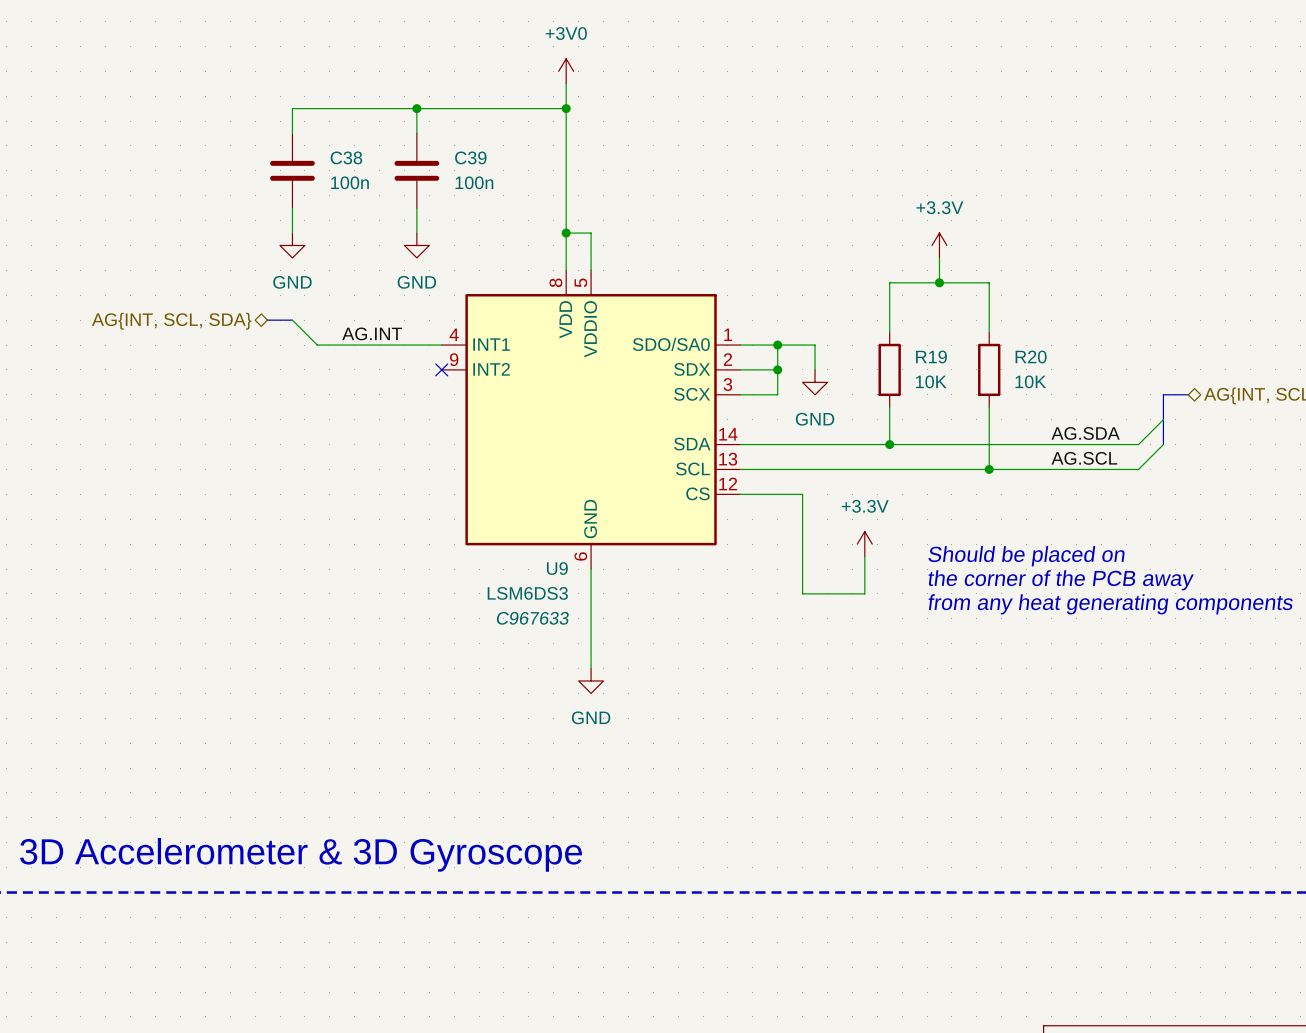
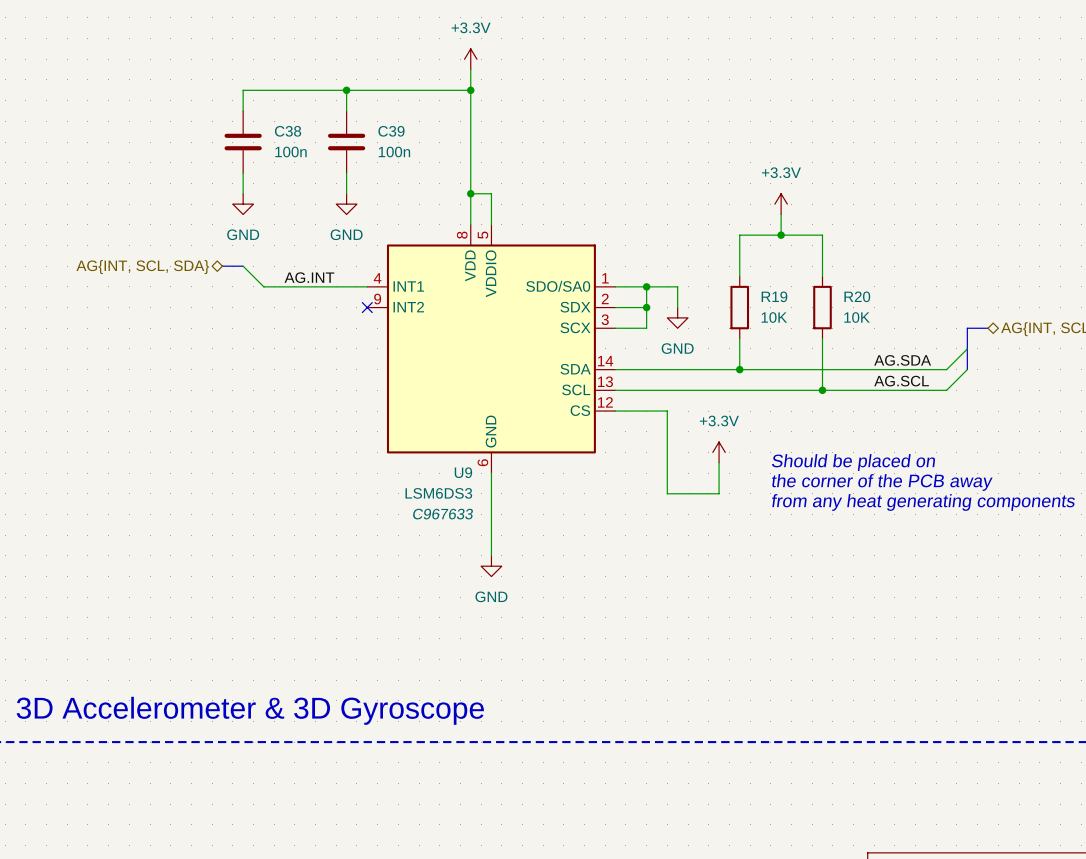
power symbol: +3V0 (566, 71) -> +3.3V (470, 59)

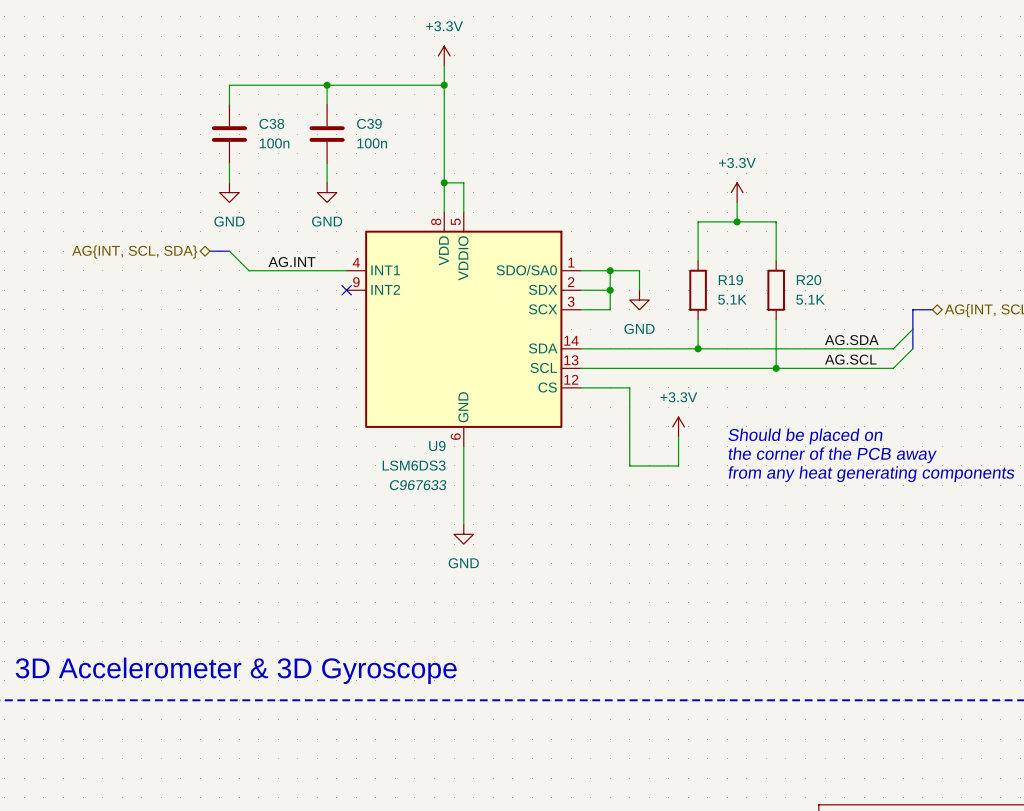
R19 value: 10K (774, 317) -> 5.1K (732, 299)
R20 value: 10K (857, 317) -> 5.1K (810, 299)

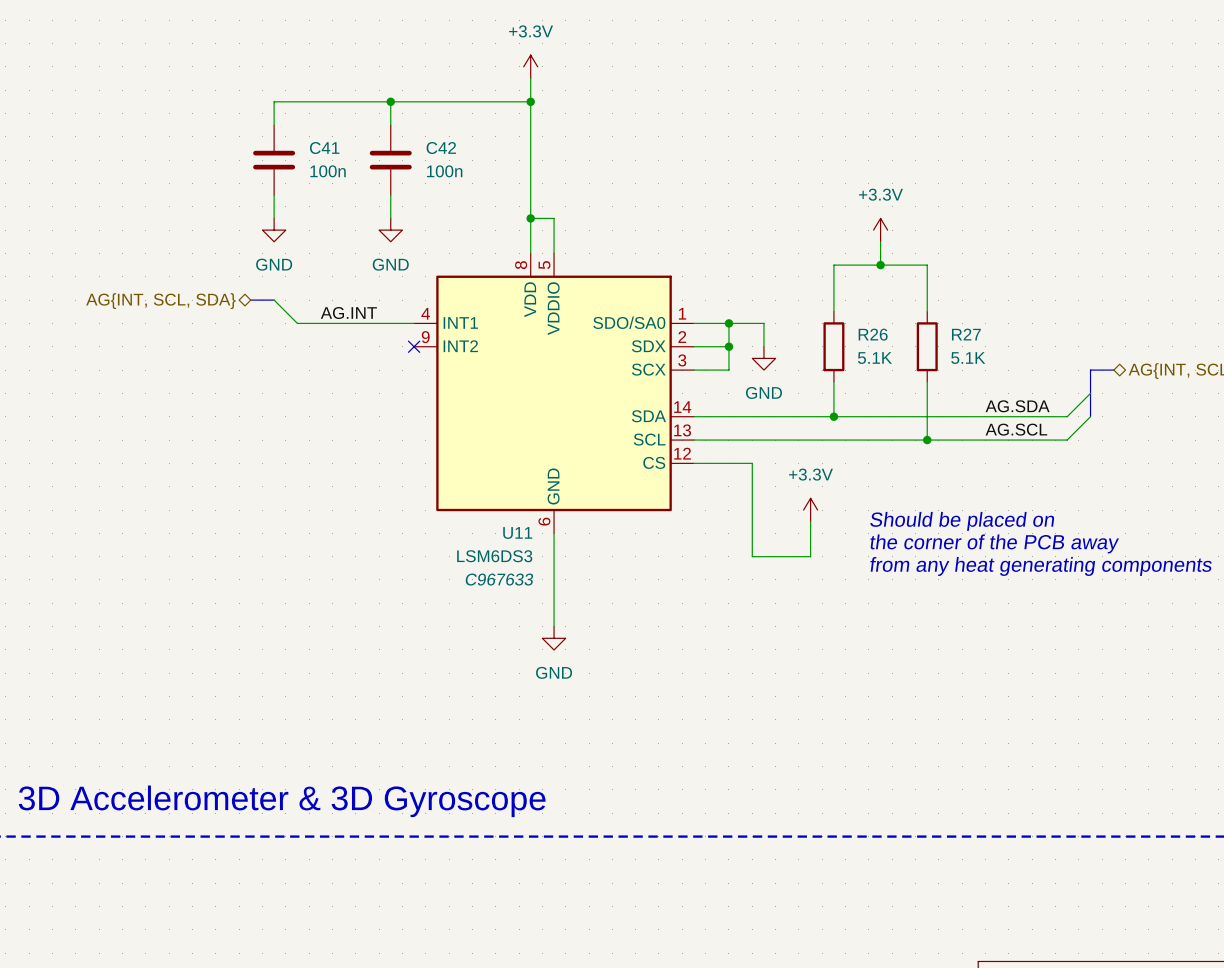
C38 name: C38 (271, 123) -> C41 (324, 148)
C39 name: C39 (369, 123) -> C42 (441, 148)
R19 name: R19 (730, 280) -> R26 (873, 334)
R20 name: R20 (809, 280) -> R27 (966, 334)
U9 name: U9 (437, 446) -> U11 (517, 532)

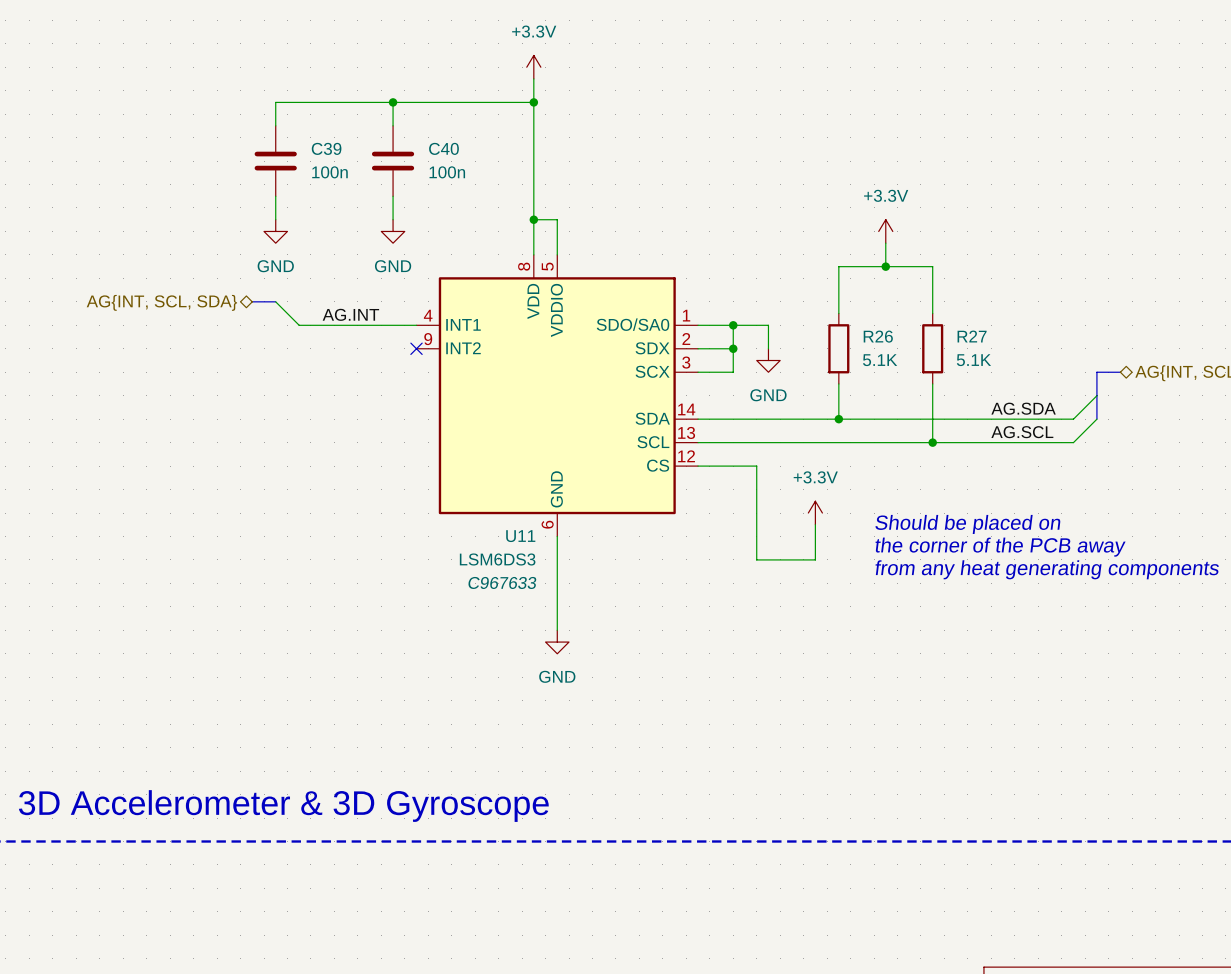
C41 name: C41 (324, 148) -> C39 (326, 148)
C42 name: C42 (441, 148) -> C40 (443, 148)

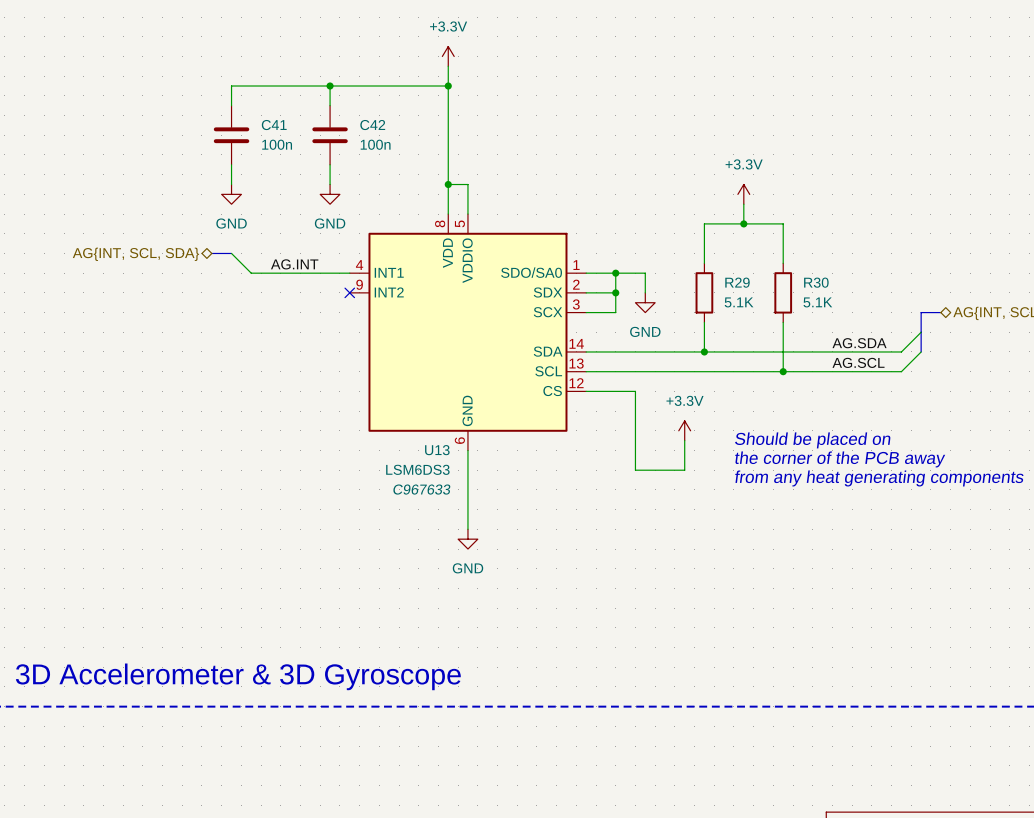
C39 name: C39 (326, 148) -> C41 (274, 125)
C40 name: C40 (443, 148) -> C42 (372, 125)
R26 name: R26 (878, 336) -> R29 (737, 282)
R27 name: R27 (972, 336) -> R30 (816, 282)
U11 name: U11 (520, 536) -> U13 (437, 450)

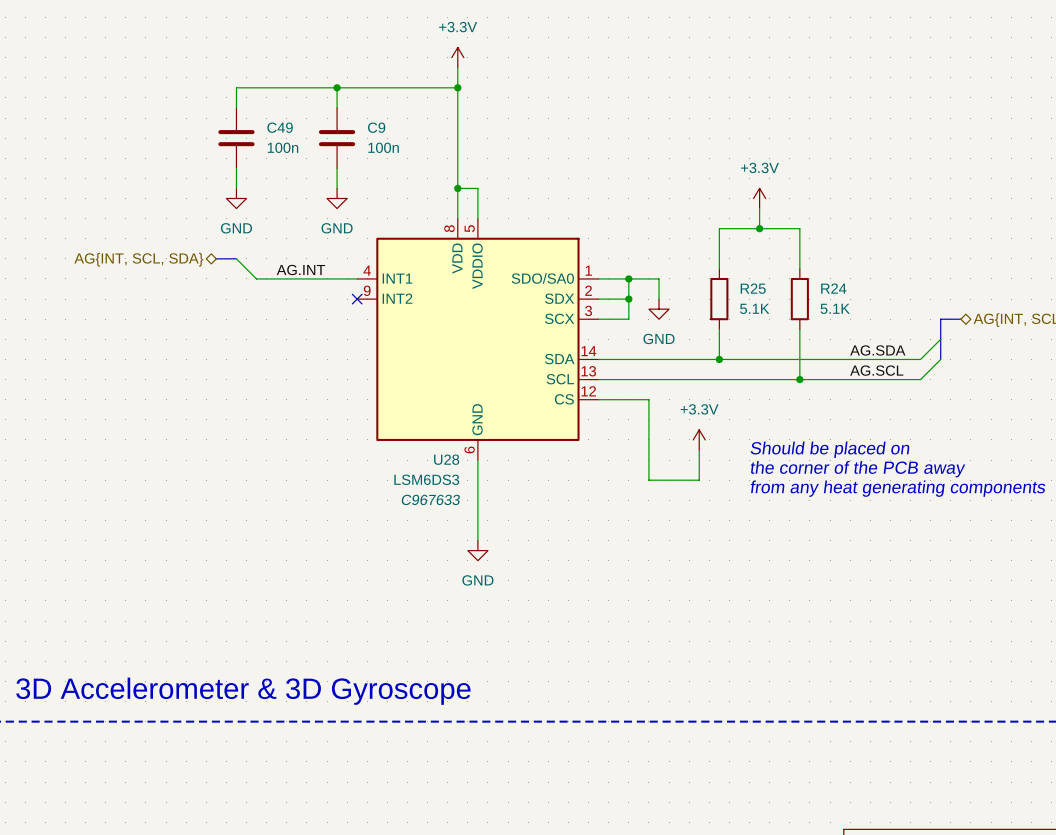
C41 name: C41 (274, 125) -> C49 (280, 127)
C42 name: C42 (372, 125) -> C9 (376, 127)
R29 name: R29 (737, 282) -> R25 (753, 288)
R30 name: R30 (816, 282) -> R24 (833, 288)
U13 name: U13 (437, 450) -> U28 (446, 459)

